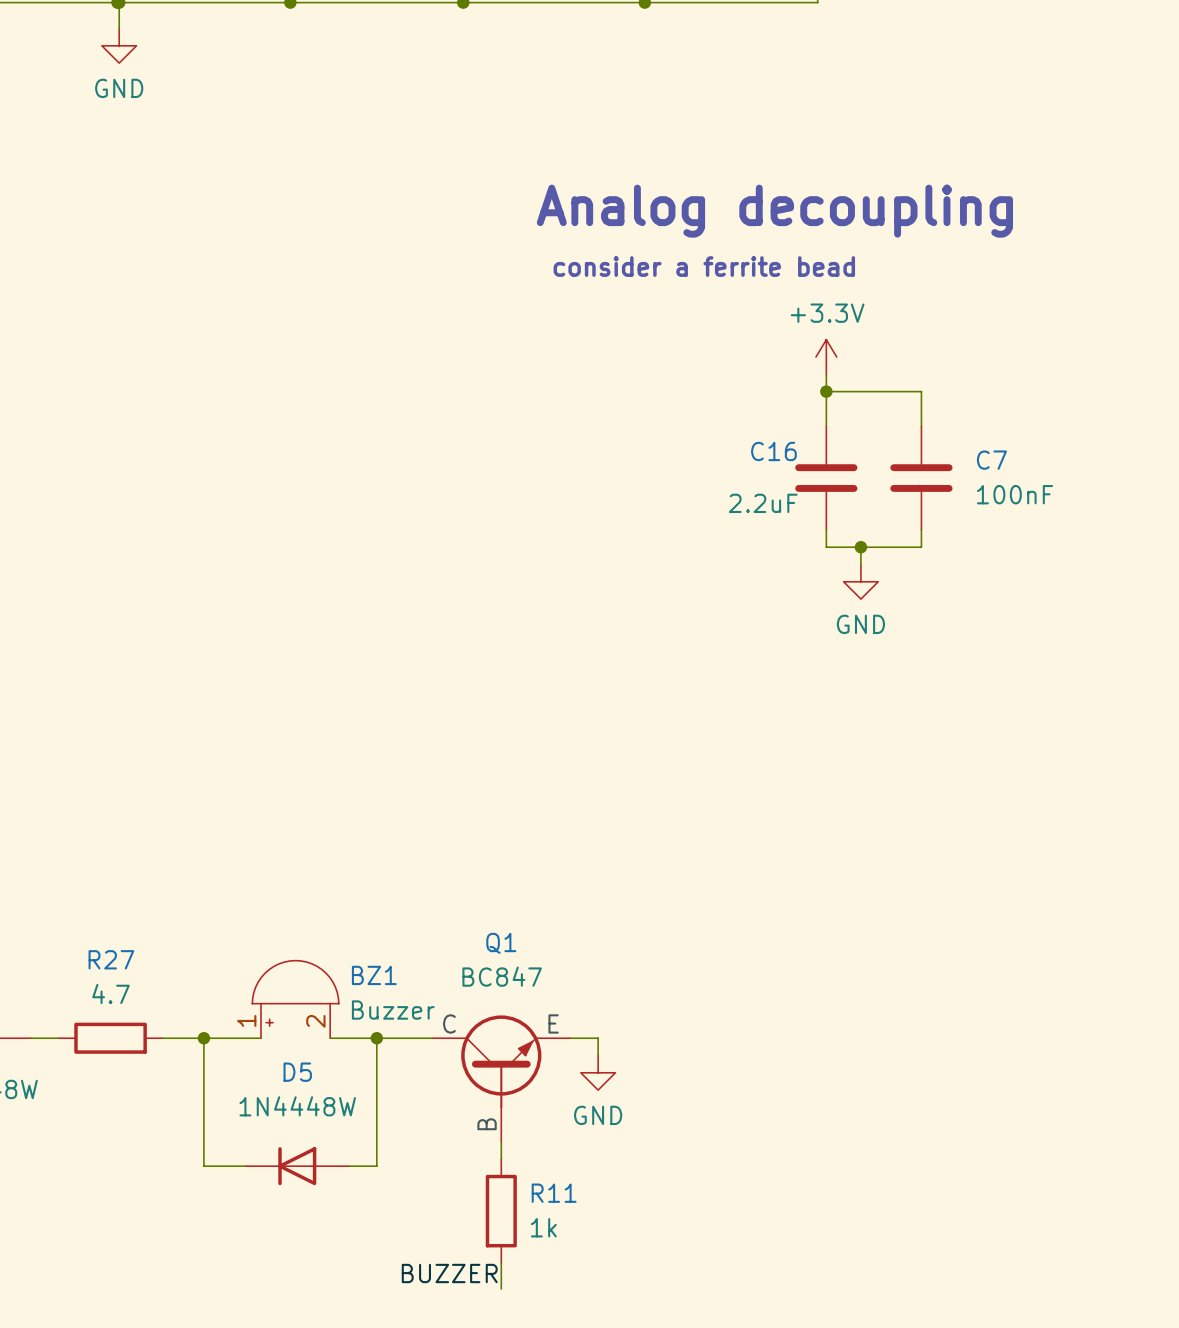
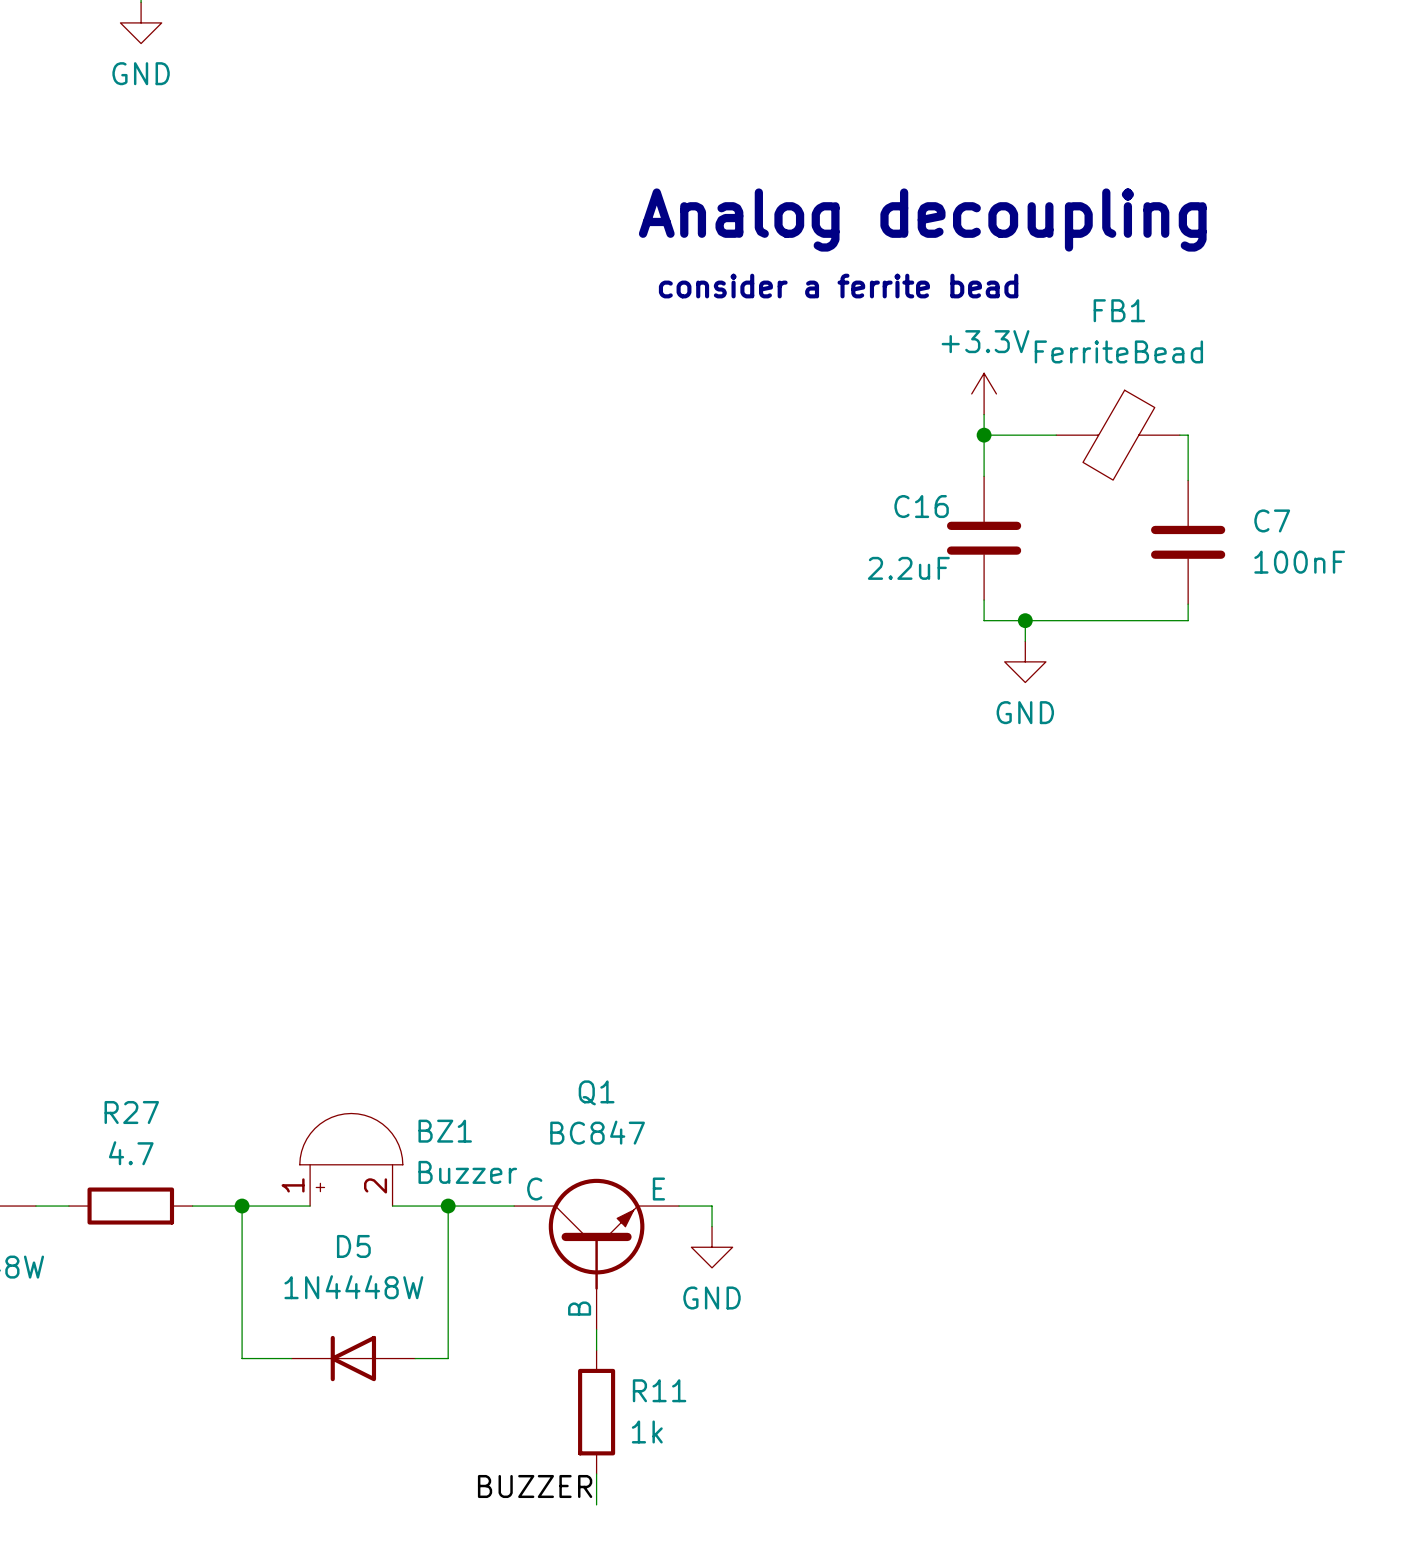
wire: (886, 391) (921, 391) (921, 426) -> none
FB1: none -> FerriteBead (1118, 435)
wire: none -> (1179, 435) (1188, 435) (1188, 480)
C7 position: (921, 478) -> (1188, 542)
wire: (921, 529) (921, 547) -> (1188, 604) (1188, 620) (1097, 620)

